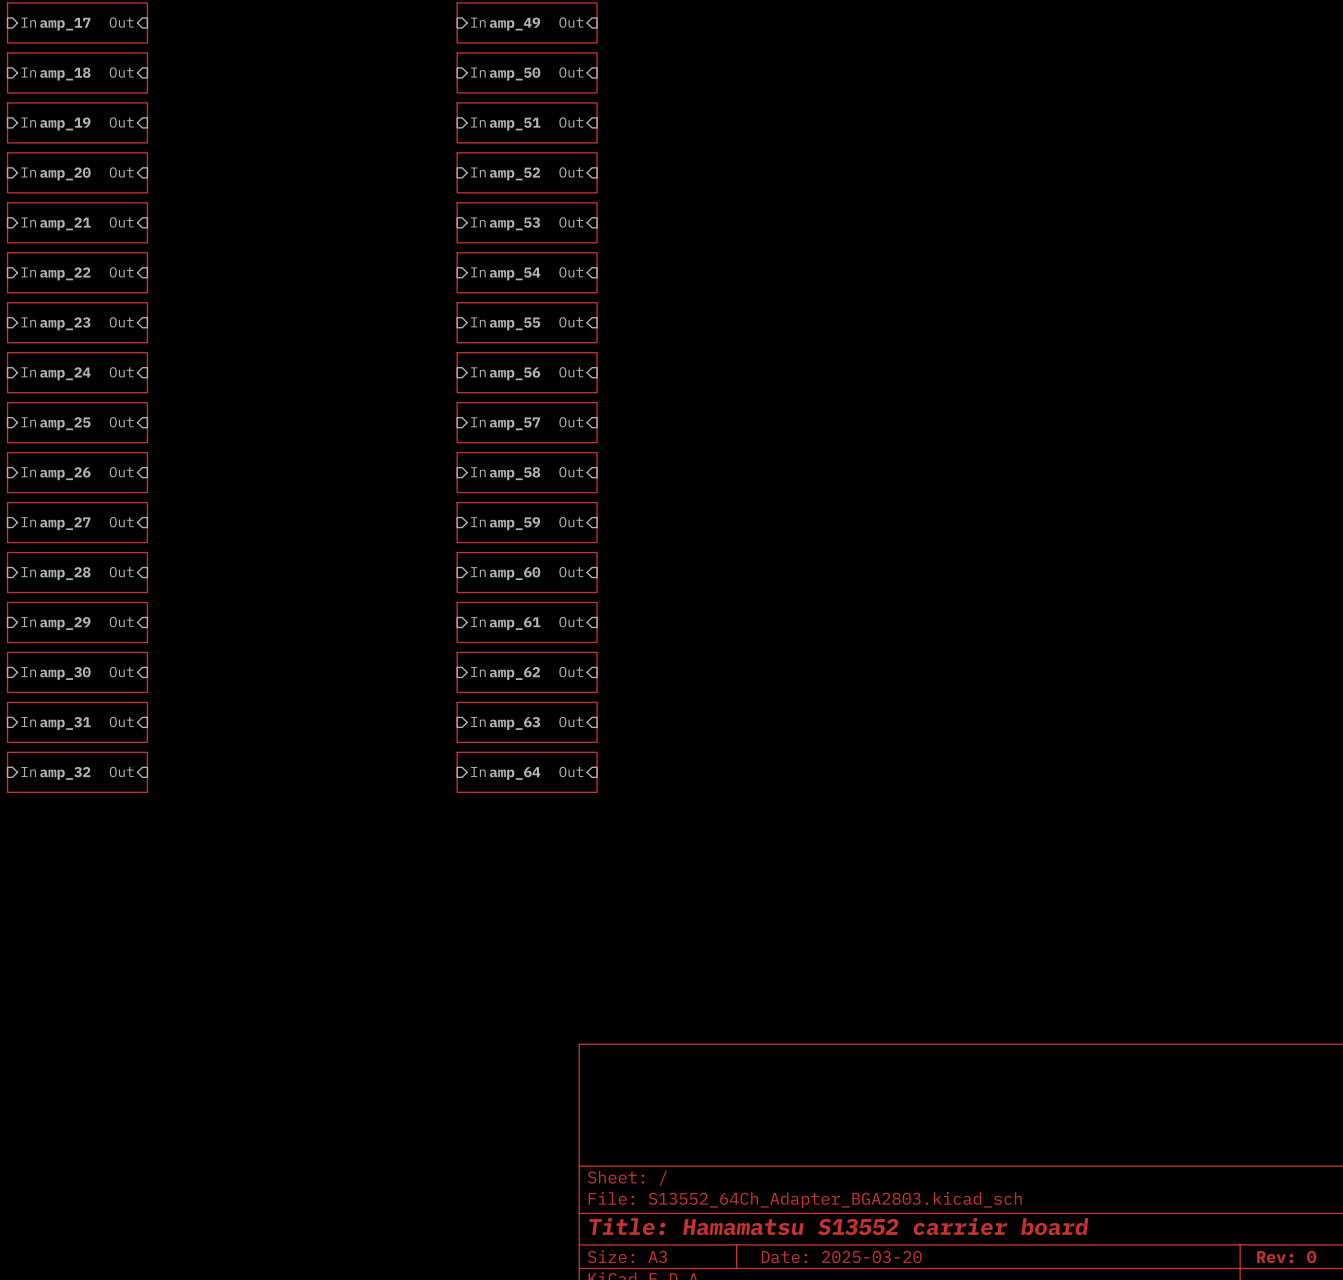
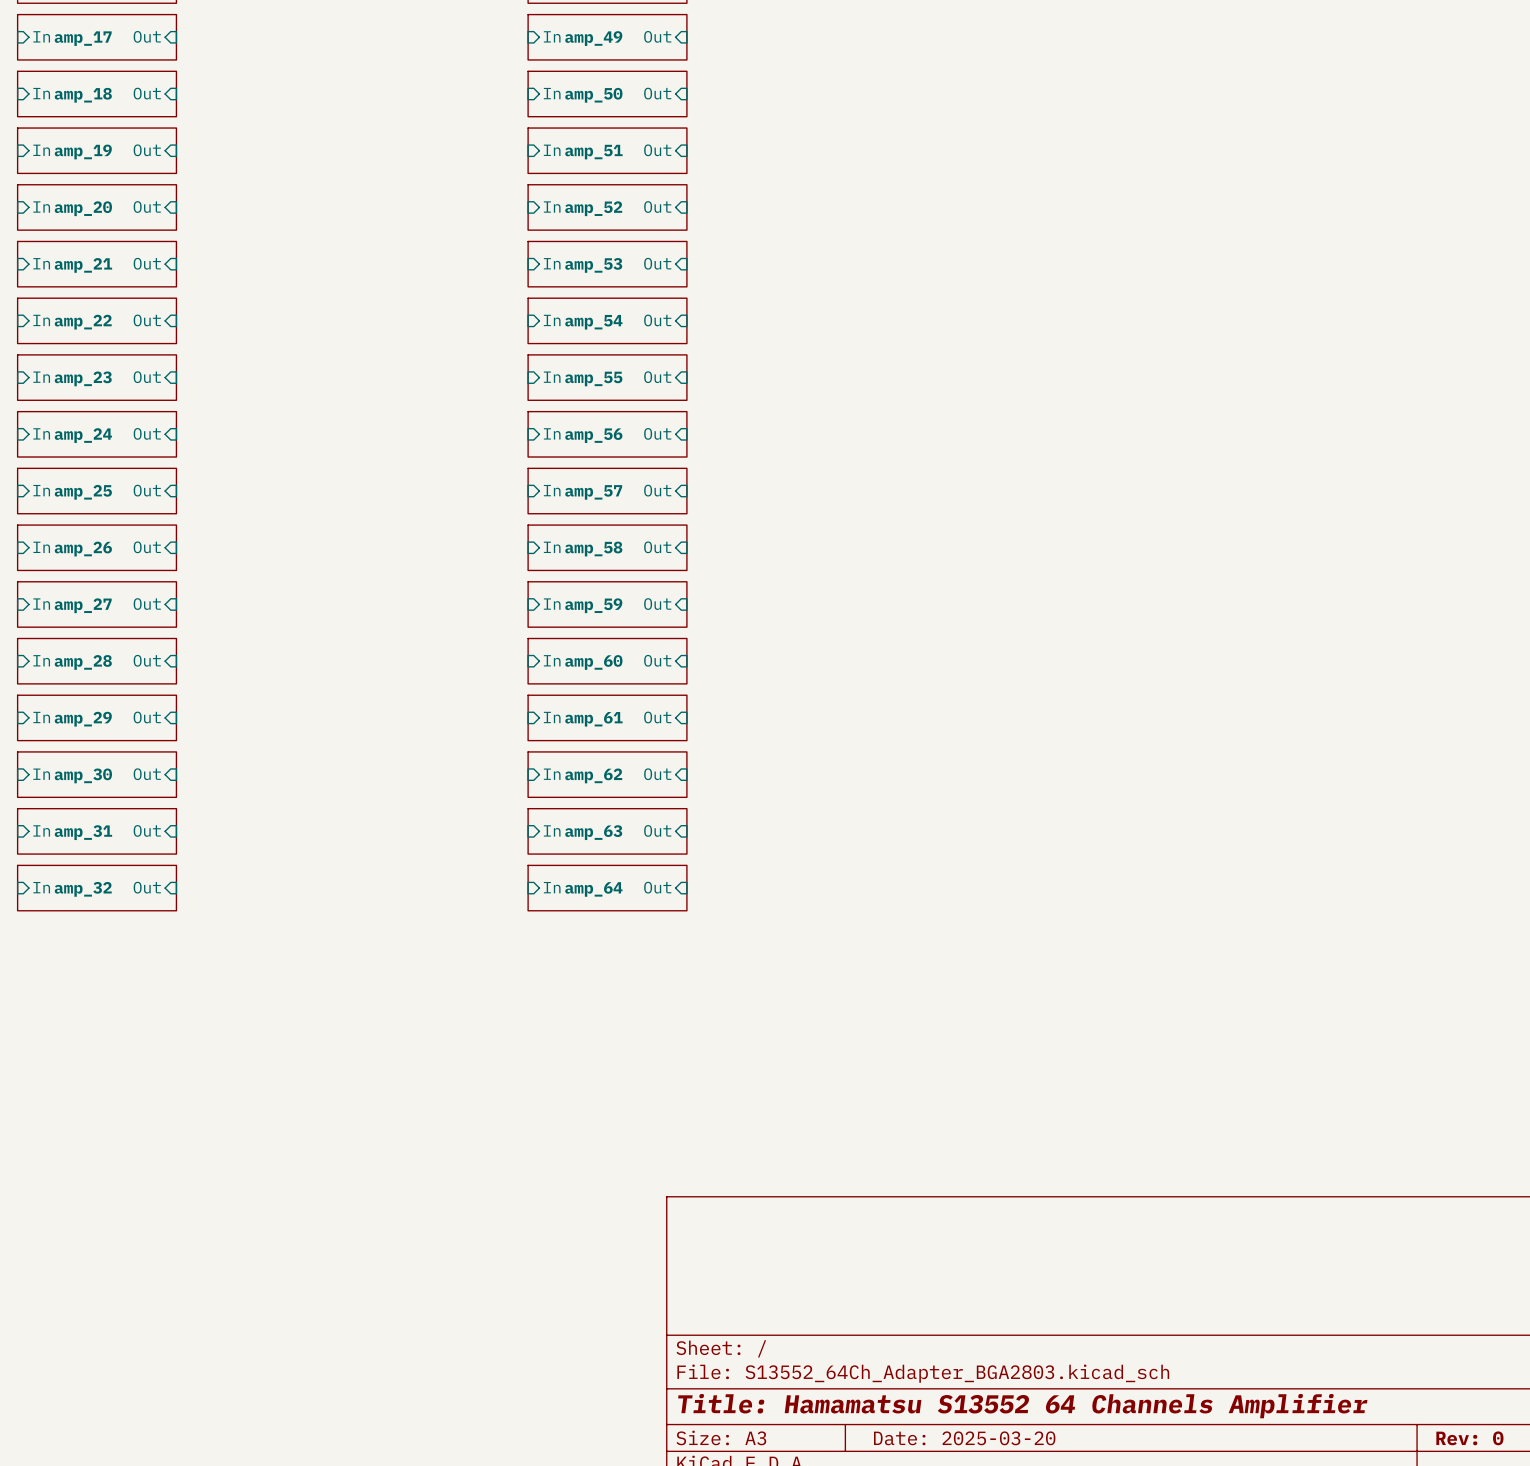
title block: Title: Hamamatsu S13552 carrier board (838, 1226) -> Title: Hamamatsu S13552 64 Channels Amplifier (1022, 1406)

